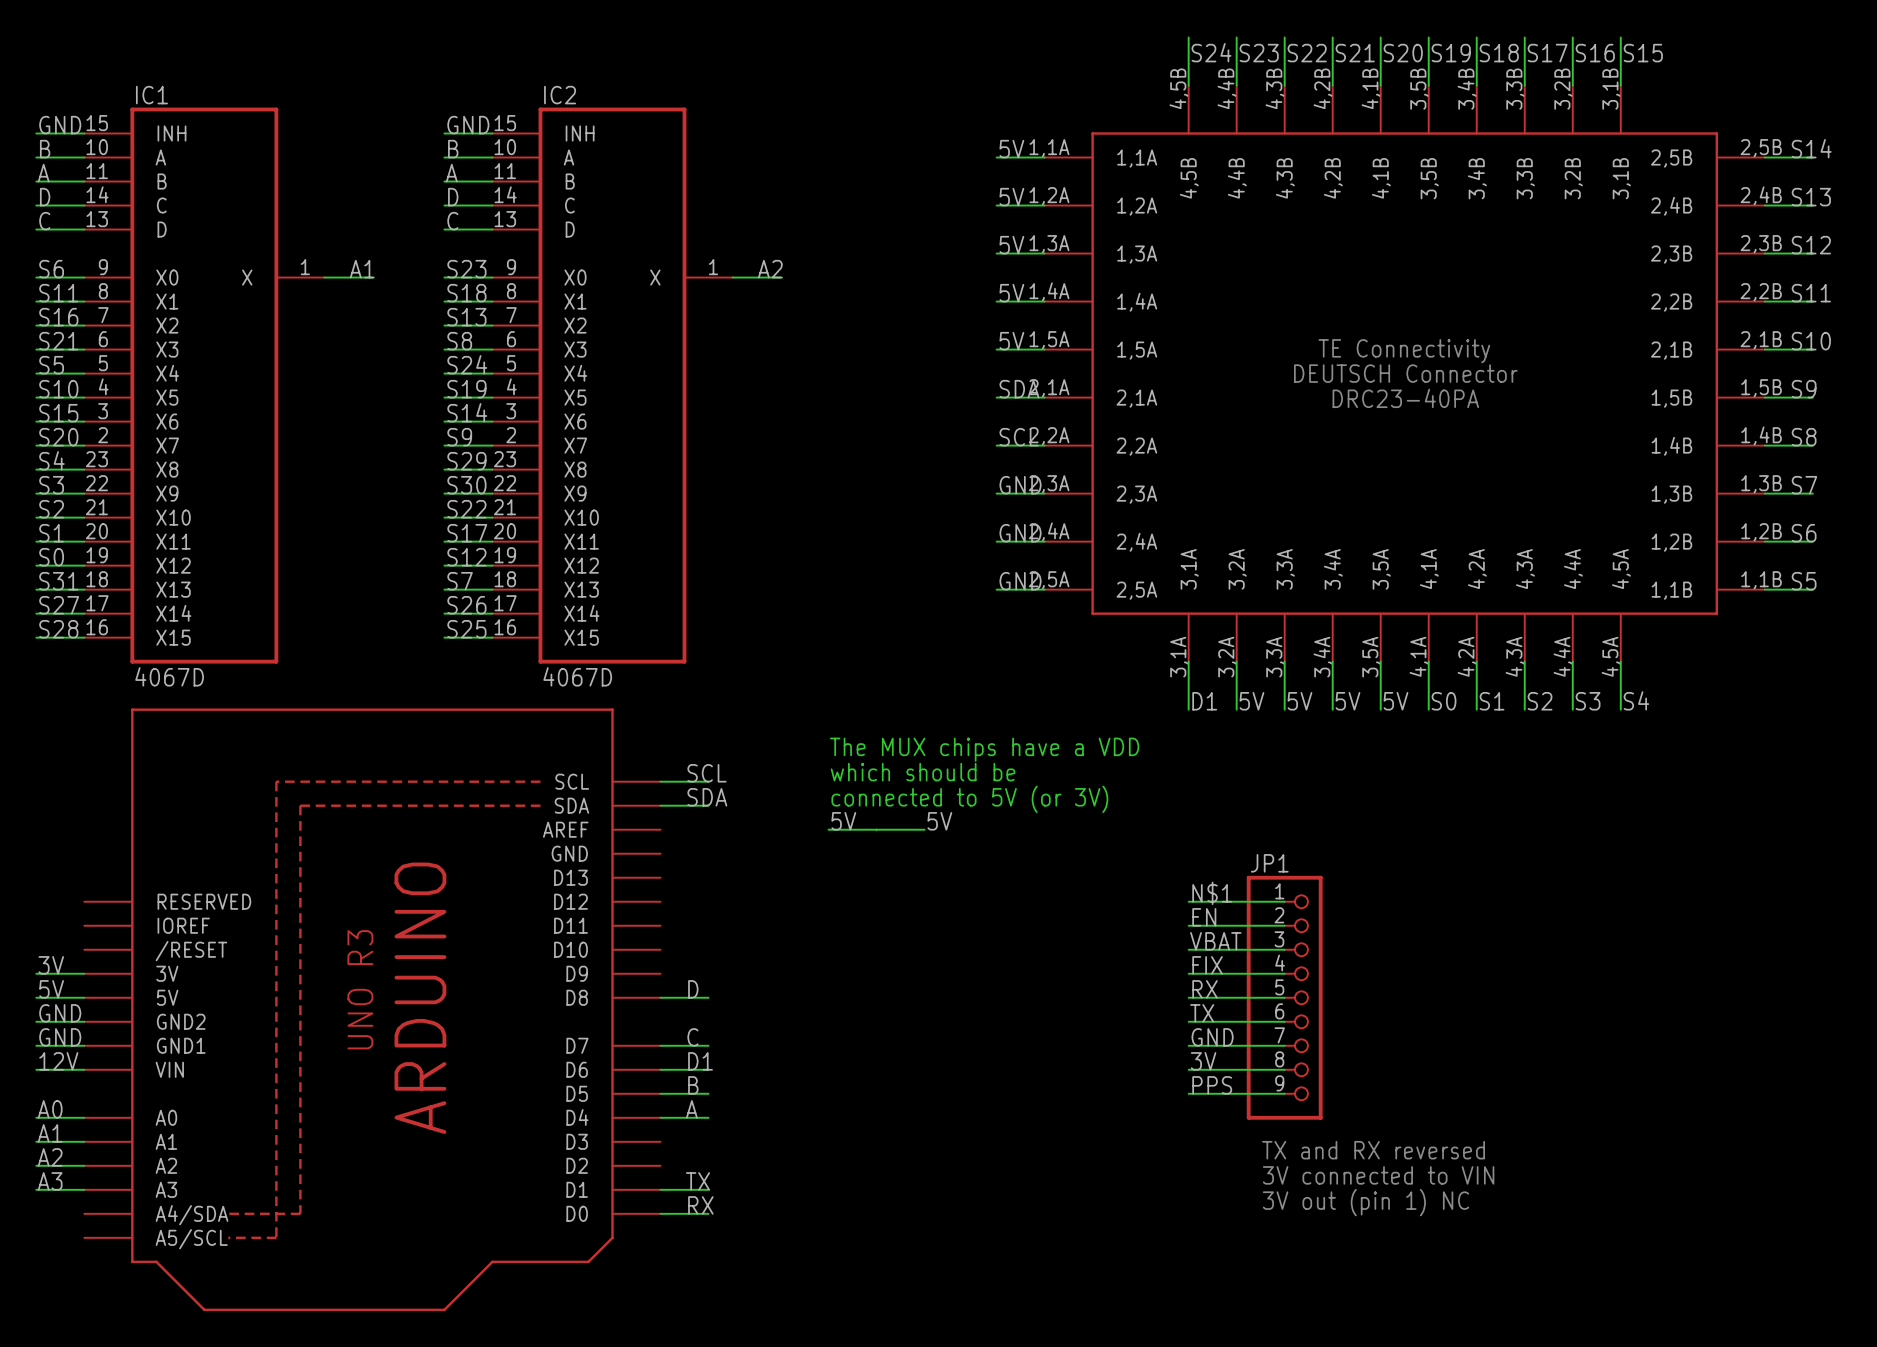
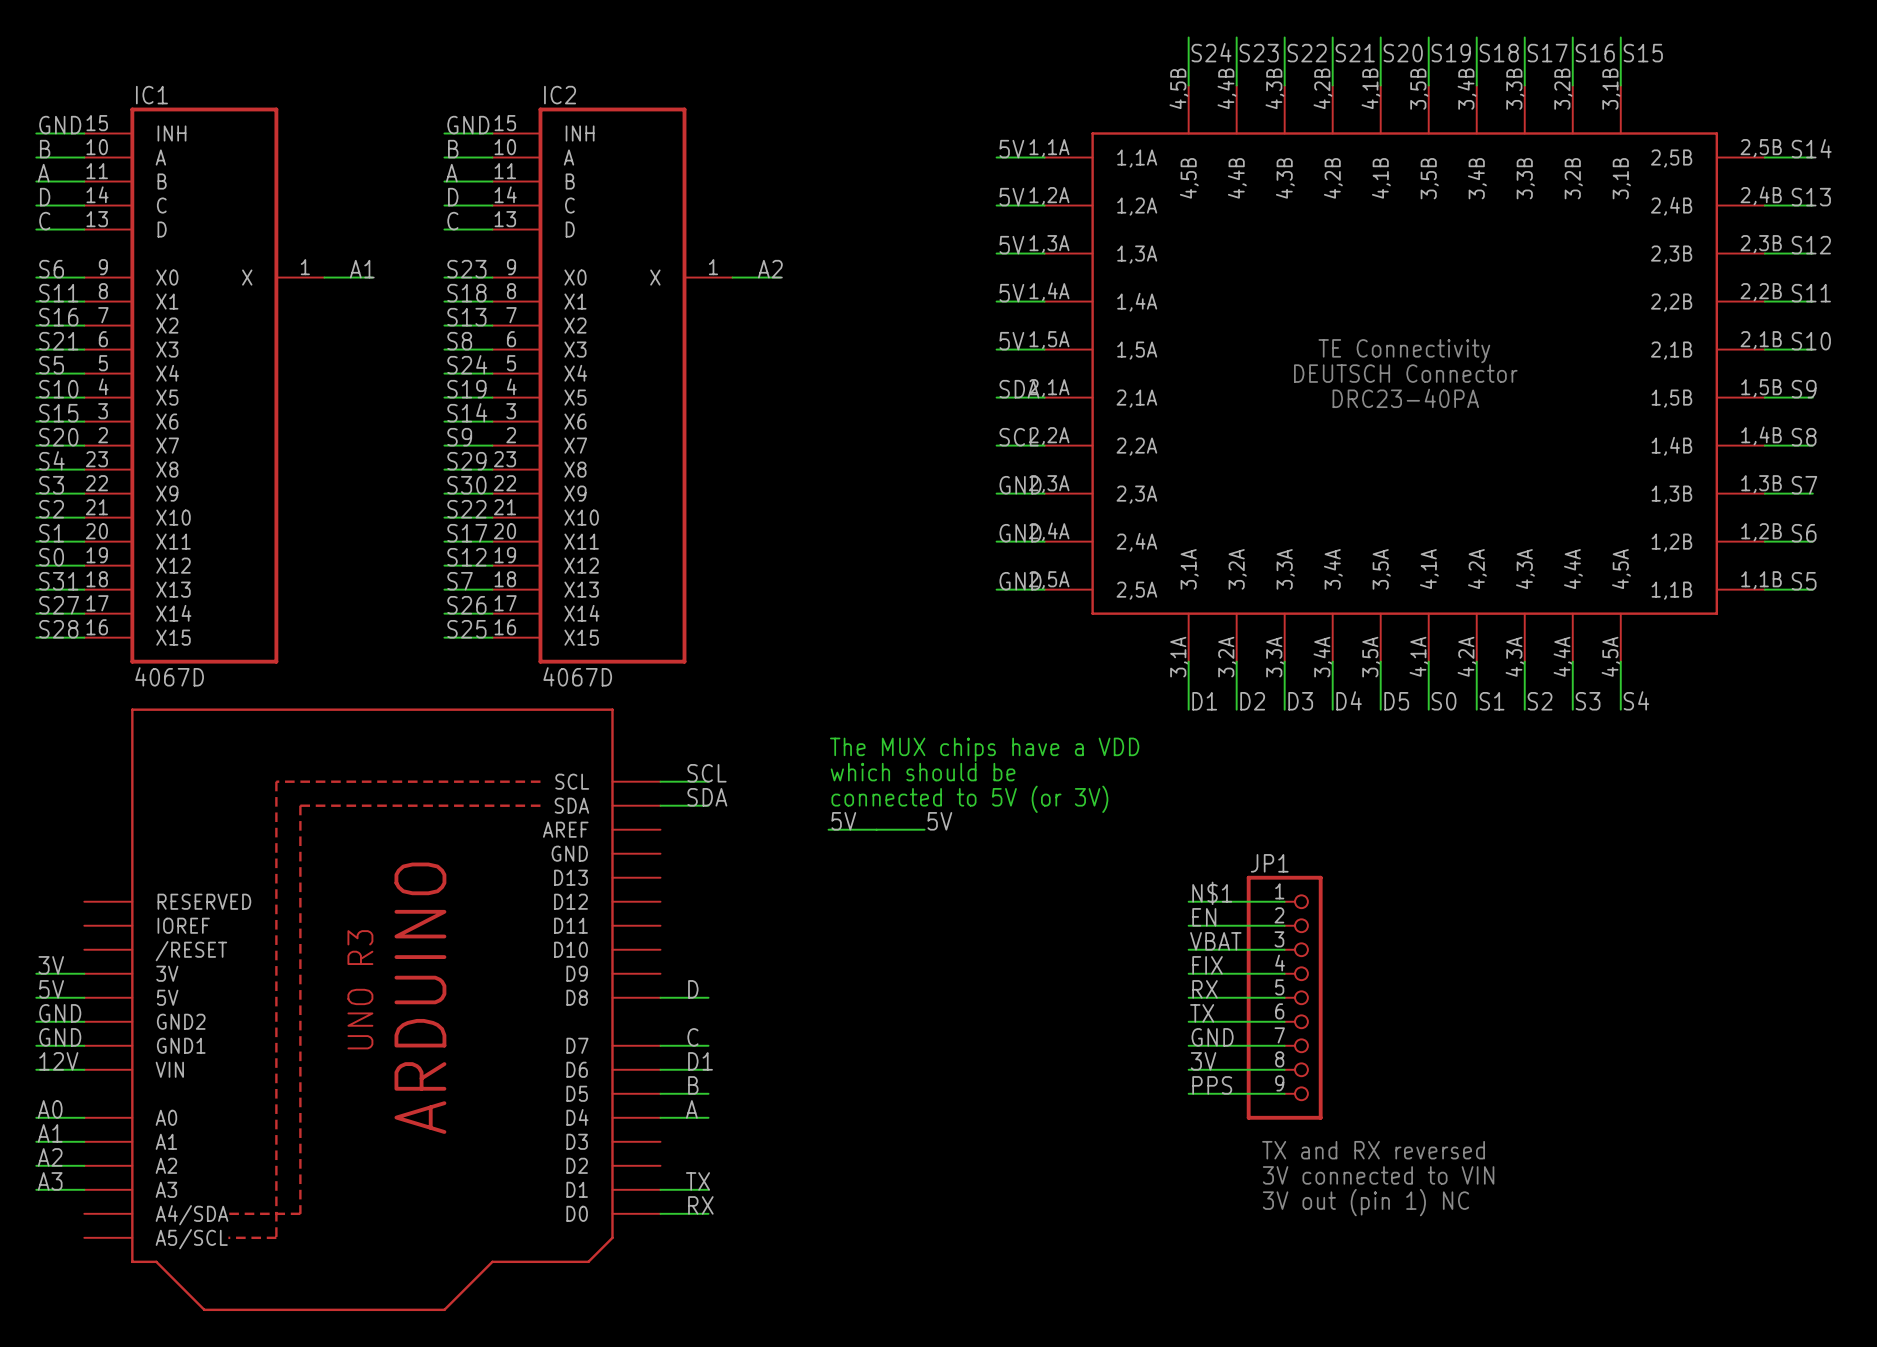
label: 5V (1251, 701) -> D2 (1252, 701)
label: 5V (1299, 701) -> D3 (1300, 701)
label: 5V (1347, 701) -> D4 (1349, 700)
label: 5V (1396, 701) -> D5 (1396, 701)

